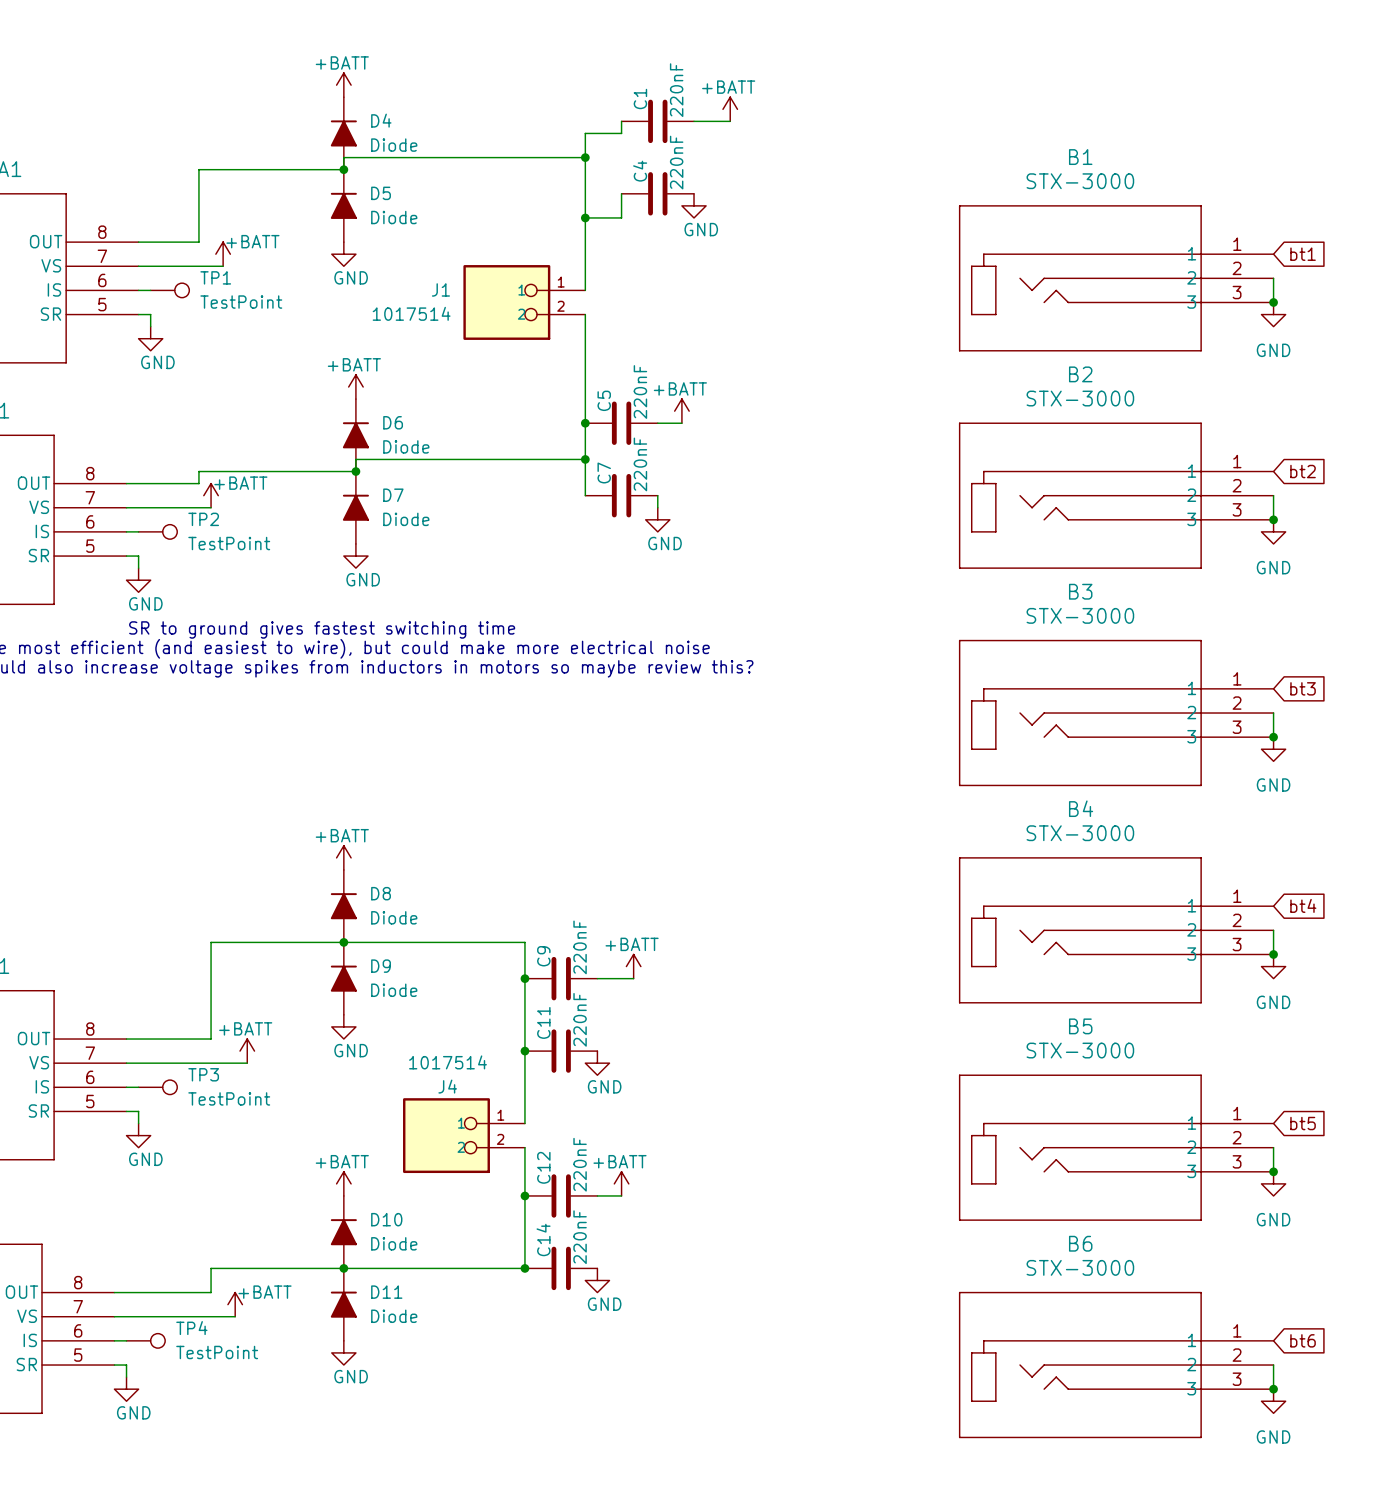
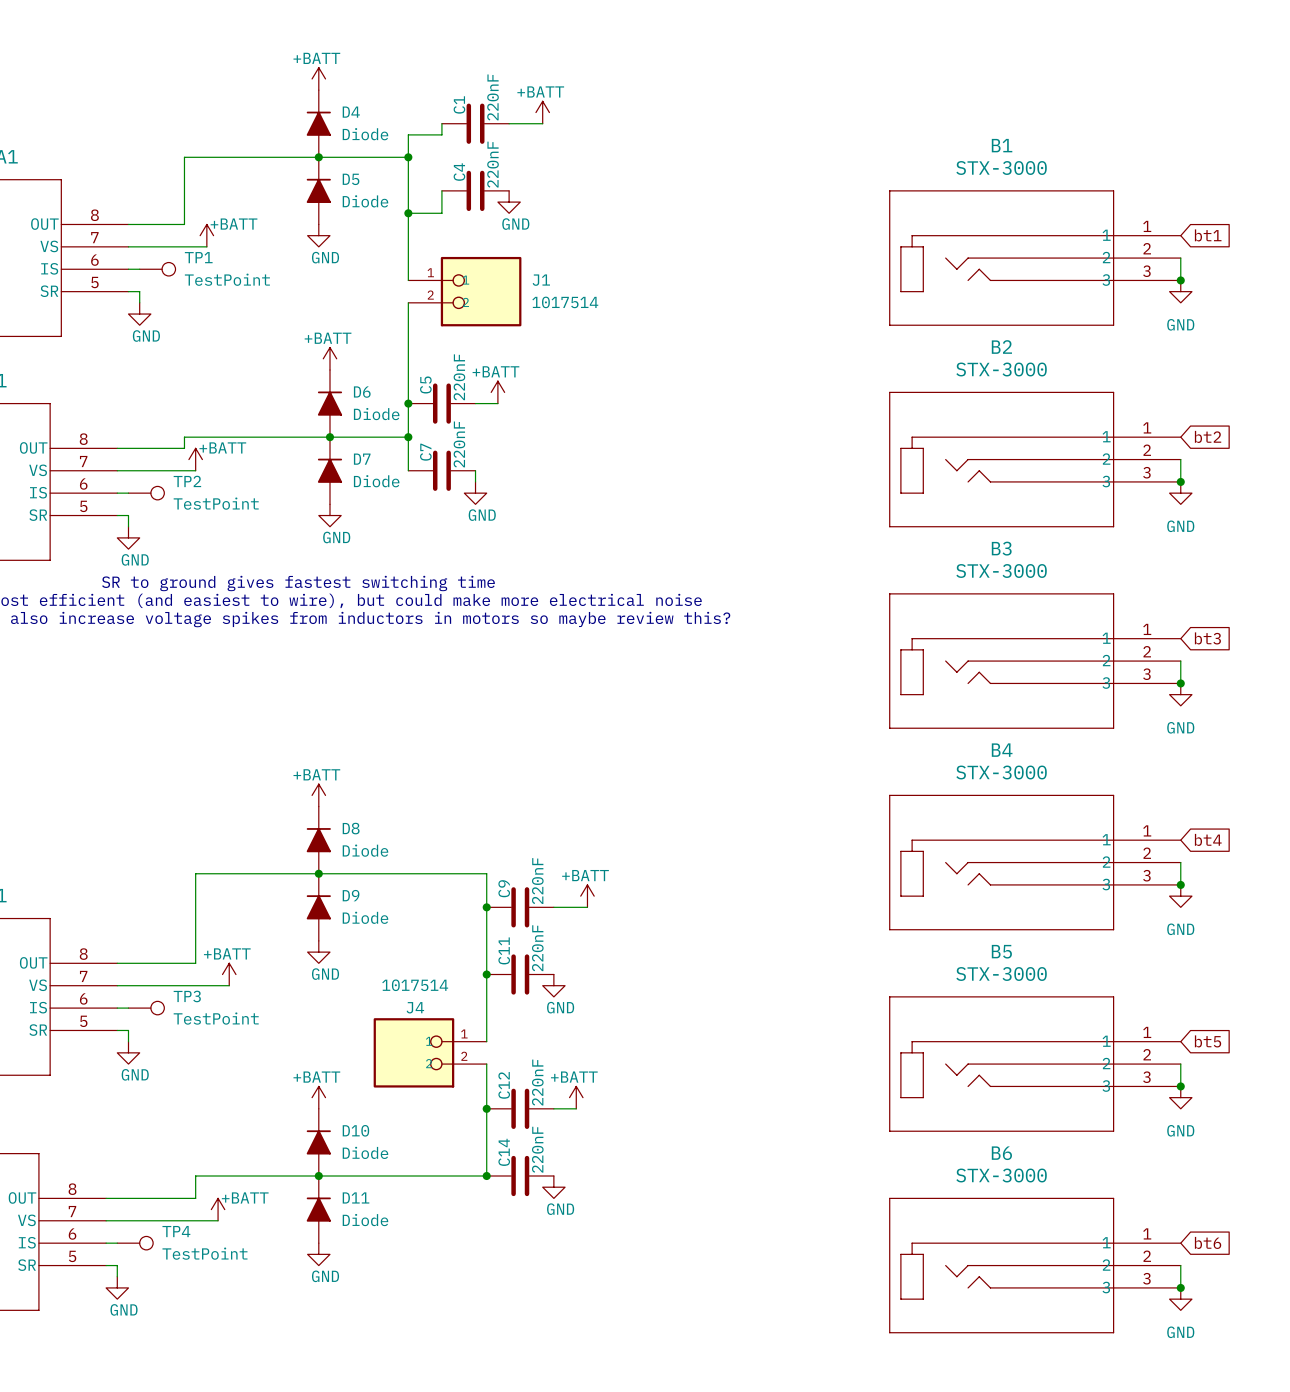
power symbol position: +BATT (730, 109) -> +BATT (542, 112)
wire: (621, 121) (621, 133) (585, 133) (585, 290) -> (441, 123) (441, 134) (408, 134) (408, 280)
C1 position: (657, 121) -> (475, 123)
wire: (694, 121) (730, 121) -> (509, 123) (542, 123)
wire: (585, 157) (343, 157) (343, 169) -> (408, 157) (318, 157)
junction: (585, 157) -> none
junction: none -> (408, 157)
wire: (621, 193) (621, 217) (585, 217) -> (441, 190) (441, 213) (408, 213)
C4 position: (657, 193) -> (475, 190)
power symbol position: GND (694, 205) -> GND (509, 202)
junction: (585, 217) -> none
junction: none -> (408, 213)
J1 flip: as is (506, 302) -> left-right (481, 291)
wire: (585, 314) (585, 495) -> (408, 302) (408, 470)
power symbol position: +BATT (681, 411) -> +BATT (497, 392)
junction: (585, 423) -> none
C5 position: (621, 423) -> (441, 403)
wire: (657, 423) (681, 423) -> (475, 403) (497, 403)
junction: none -> (408, 403)
wire: (585, 459) (355, 459) (355, 471) -> (408, 437) (329, 437)
junction: (585, 459) -> none
junction: none -> (408, 437)
C7 position: (621, 495) -> (441, 470)
wire: (657, 495) (657, 507) -> (475, 470) (475, 481)
power symbol position: GND (657, 519) -> GND (475, 493)

